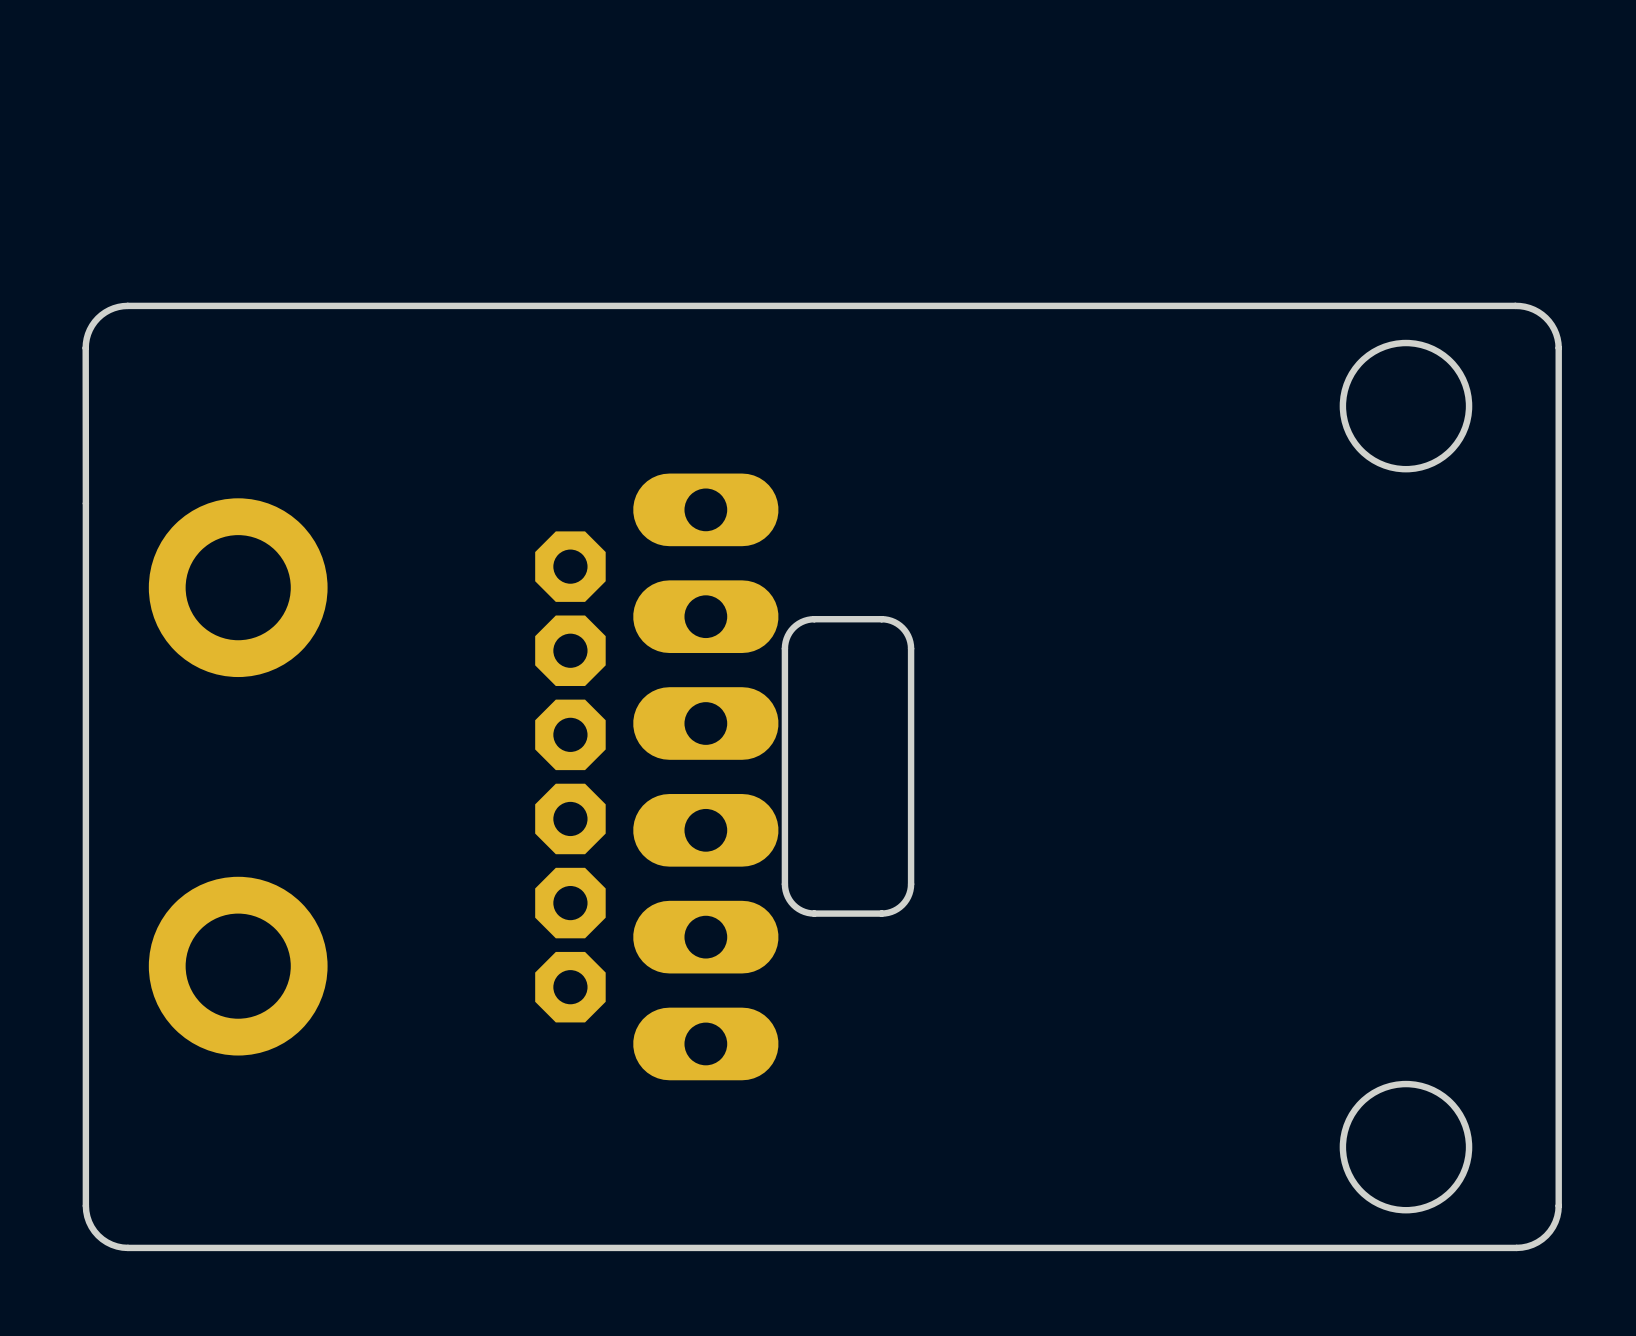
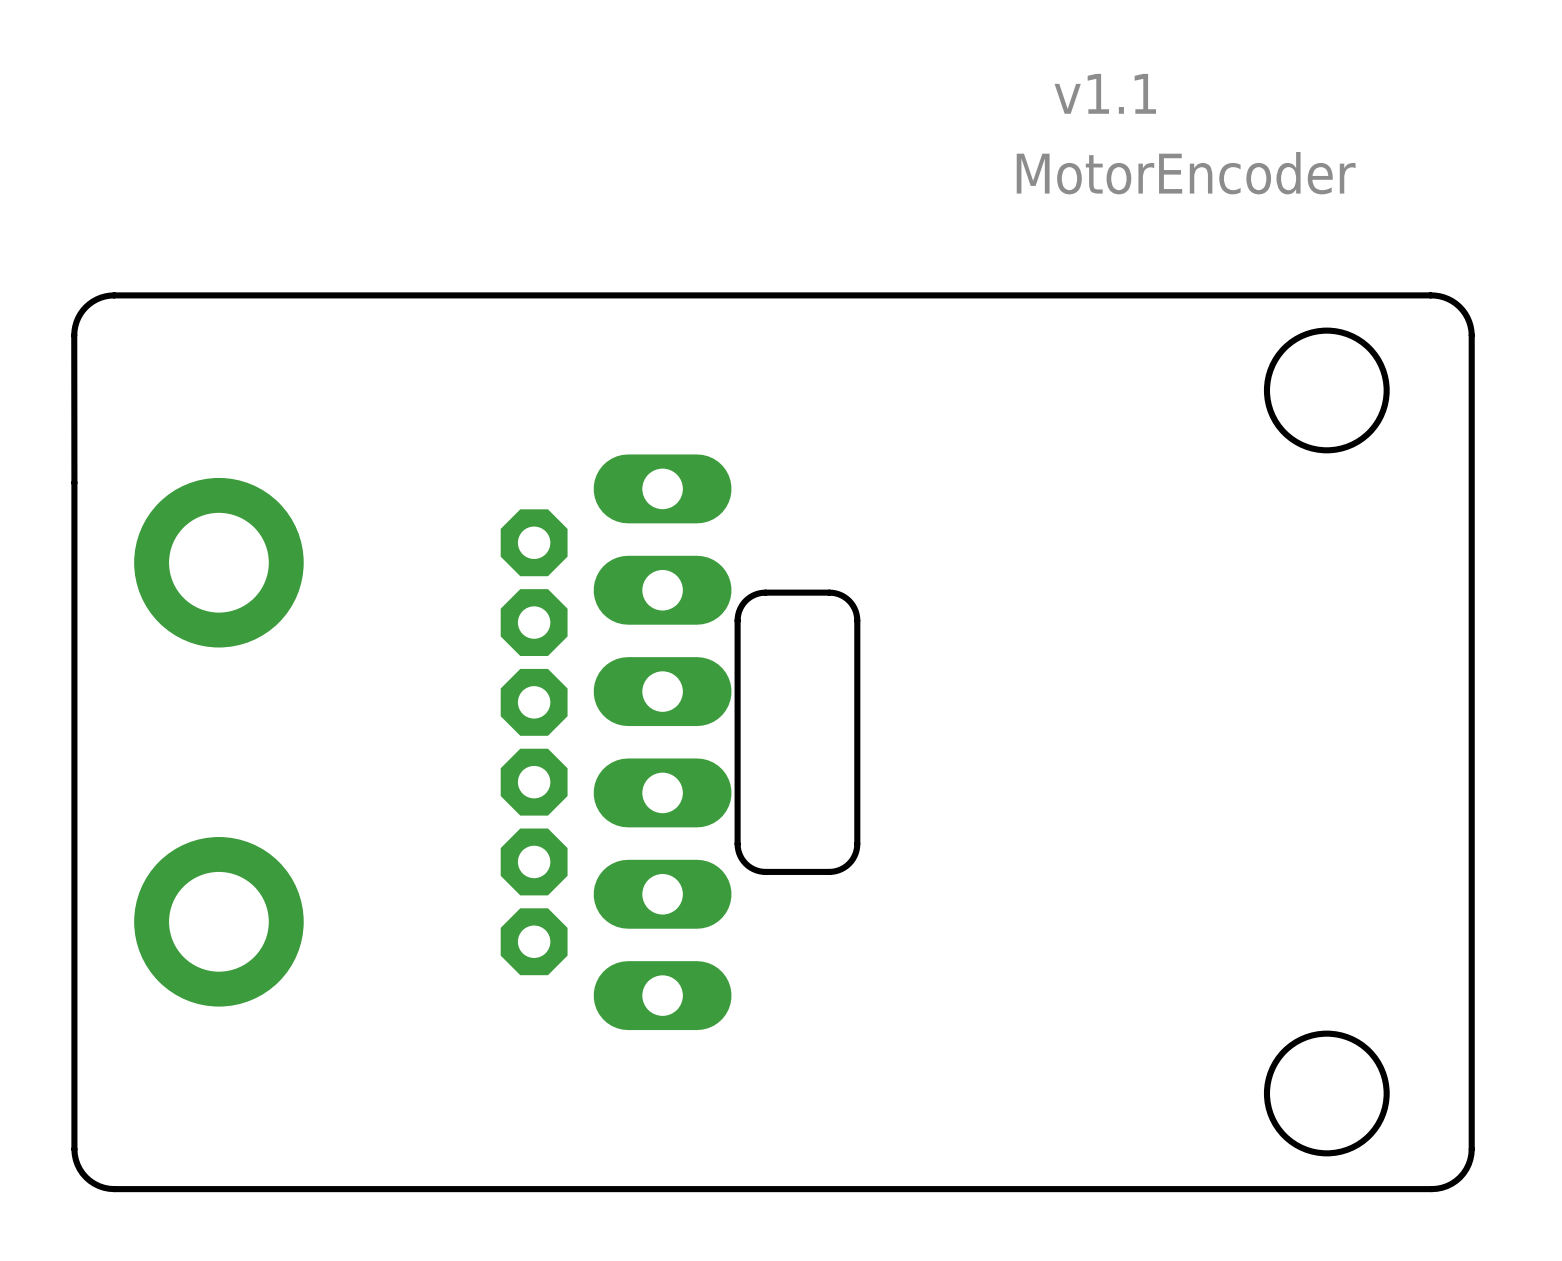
text: none -> v1.1 (1105, 93)
text: none -> MotorEncoder (1186, 173)

